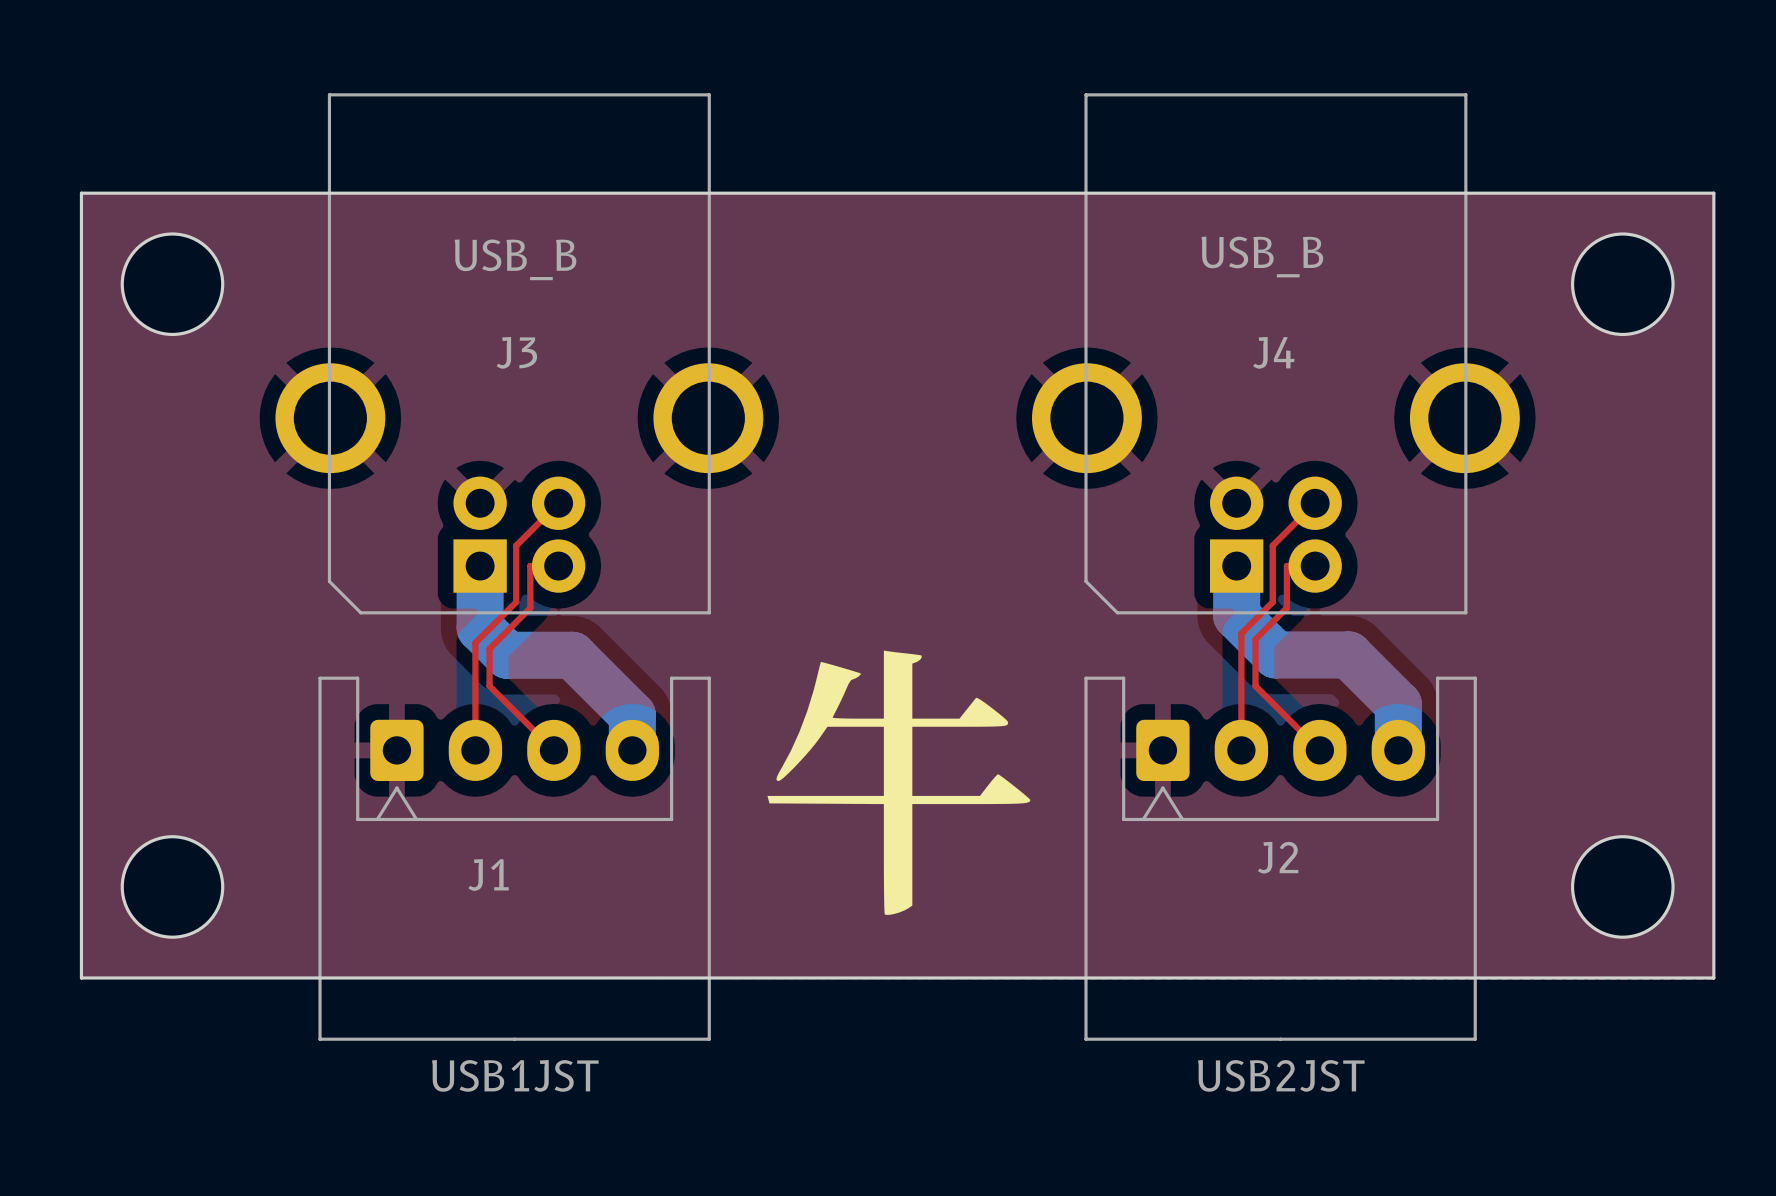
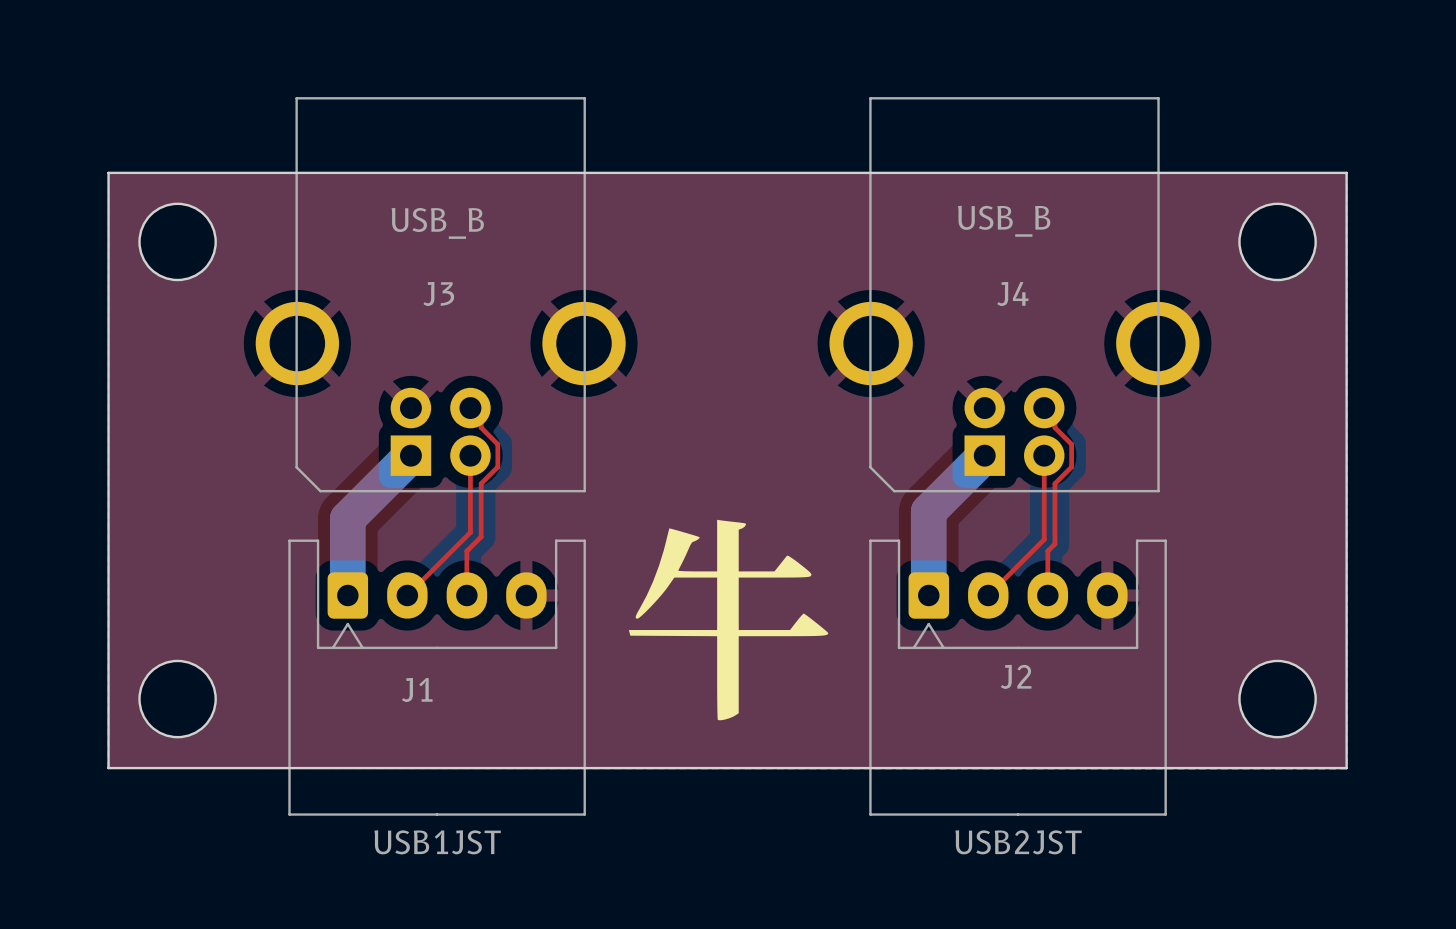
top track: (558, 503) (516, 545) (516, 602) (475, 642) (475, 750) -> (470, 455) (470, 532) (407, 595)
top track: (1315, 503) (1272, 545) (1272, 602) (1241, 633) (1241, 750) -> (1044, 455) (1044, 539) (988, 595)
bottom track: (480, 566) (480, 627) (507, 655) (572, 655) (632, 715) (632, 750) -> (410, 455) (347, 518) (347, 595)
top track: (539, 566) (530, 566) (530, 608) (489, 648) (489, 686) (553, 750) -> (470, 408) (481, 418) (481, 427) (497, 444) (497, 467) (481, 483) (481, 536) (466, 551) (466, 595)
bottom track: (1236, 566) (1236, 615) (1275, 654) (1348, 654) (1398, 704) (1398, 750) -> (984, 455) (928, 511) (928, 595)
top track: (1315, 566) (1286, 566) (1286, 608) (1255, 639) (1255, 686) (1319, 750) -> (1044, 408) (1054, 418) (1054, 427) (1071, 444) (1071, 467) (1054, 483) (1054, 543) (1047, 551) (1047, 595)

